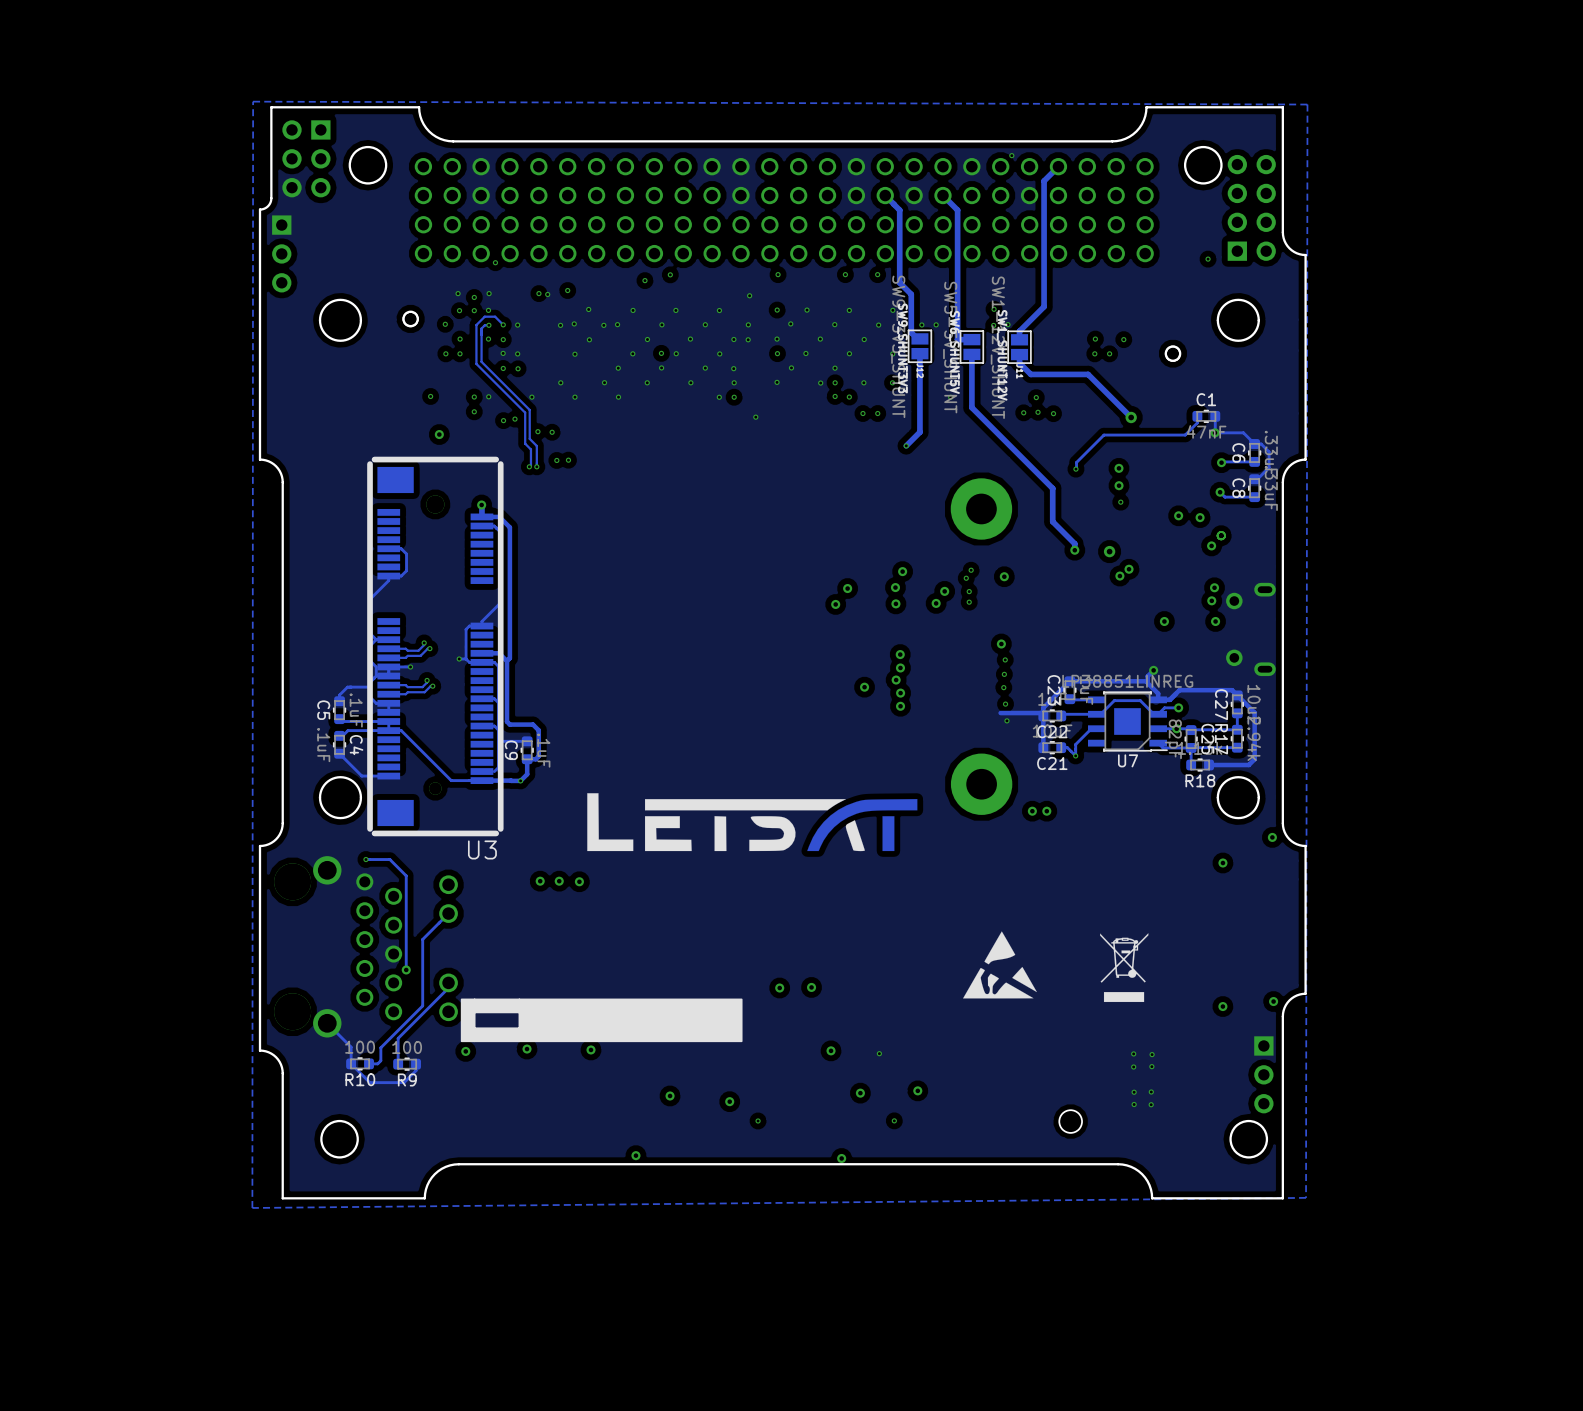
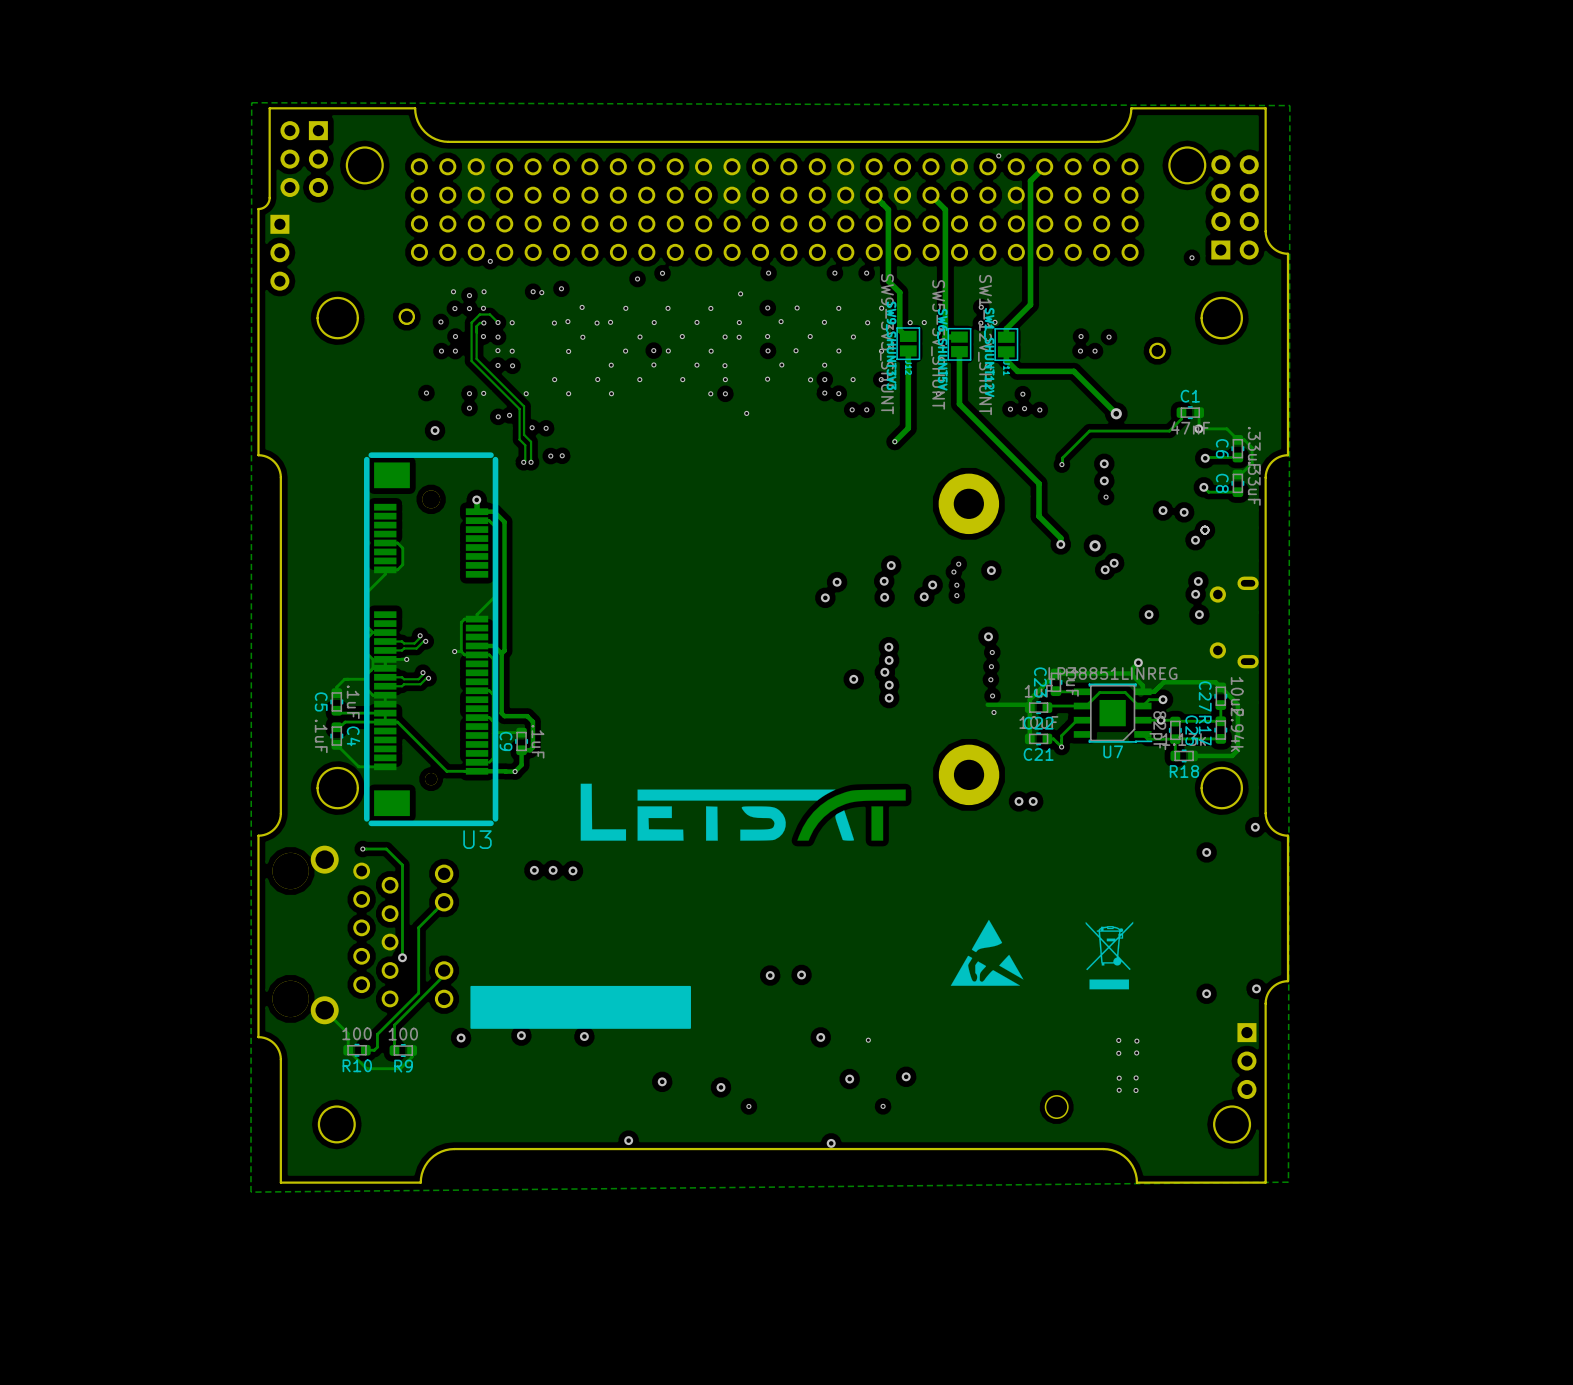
drawing: [460, 998, 521, 1043] -> none
drawing position: (630, 1020) -> (580, 1007)

